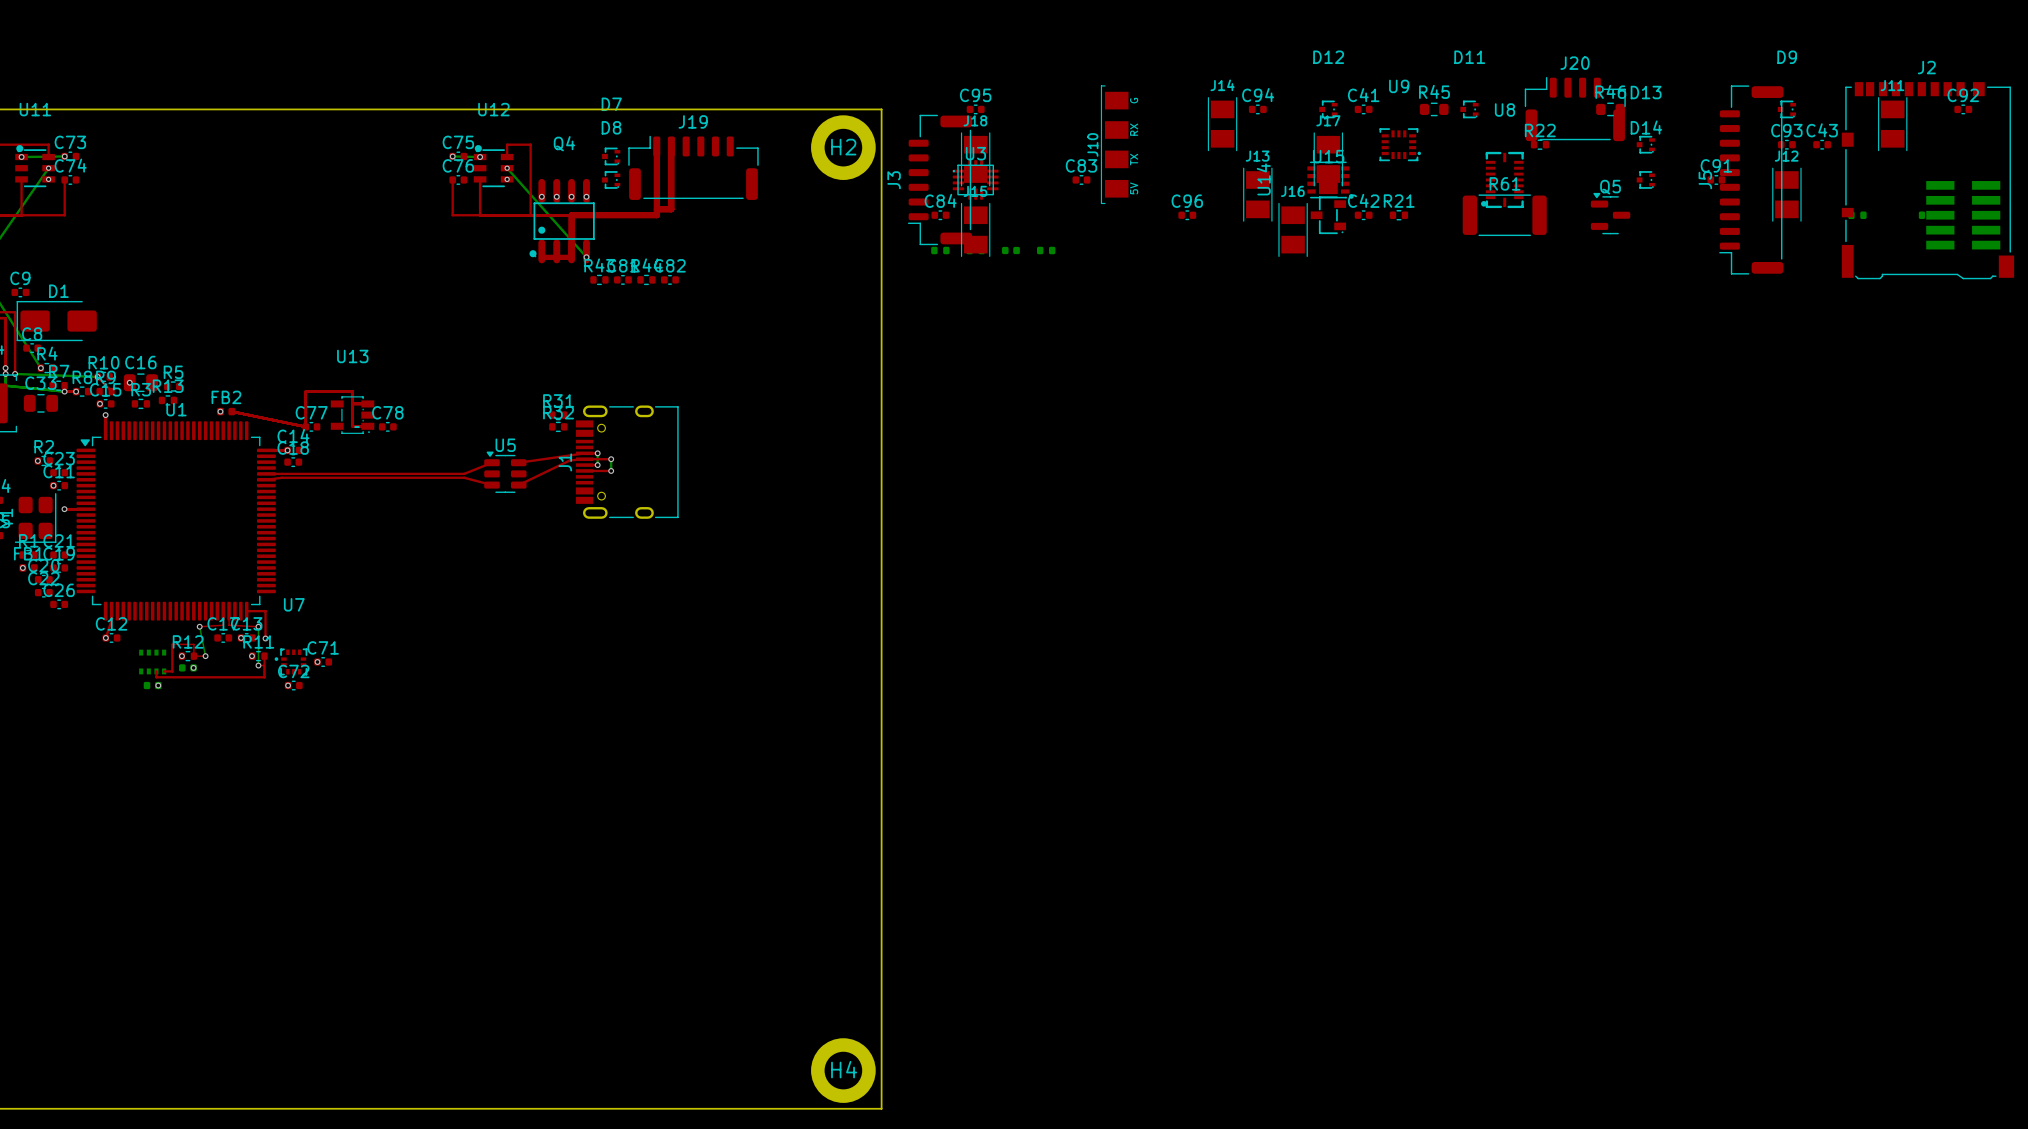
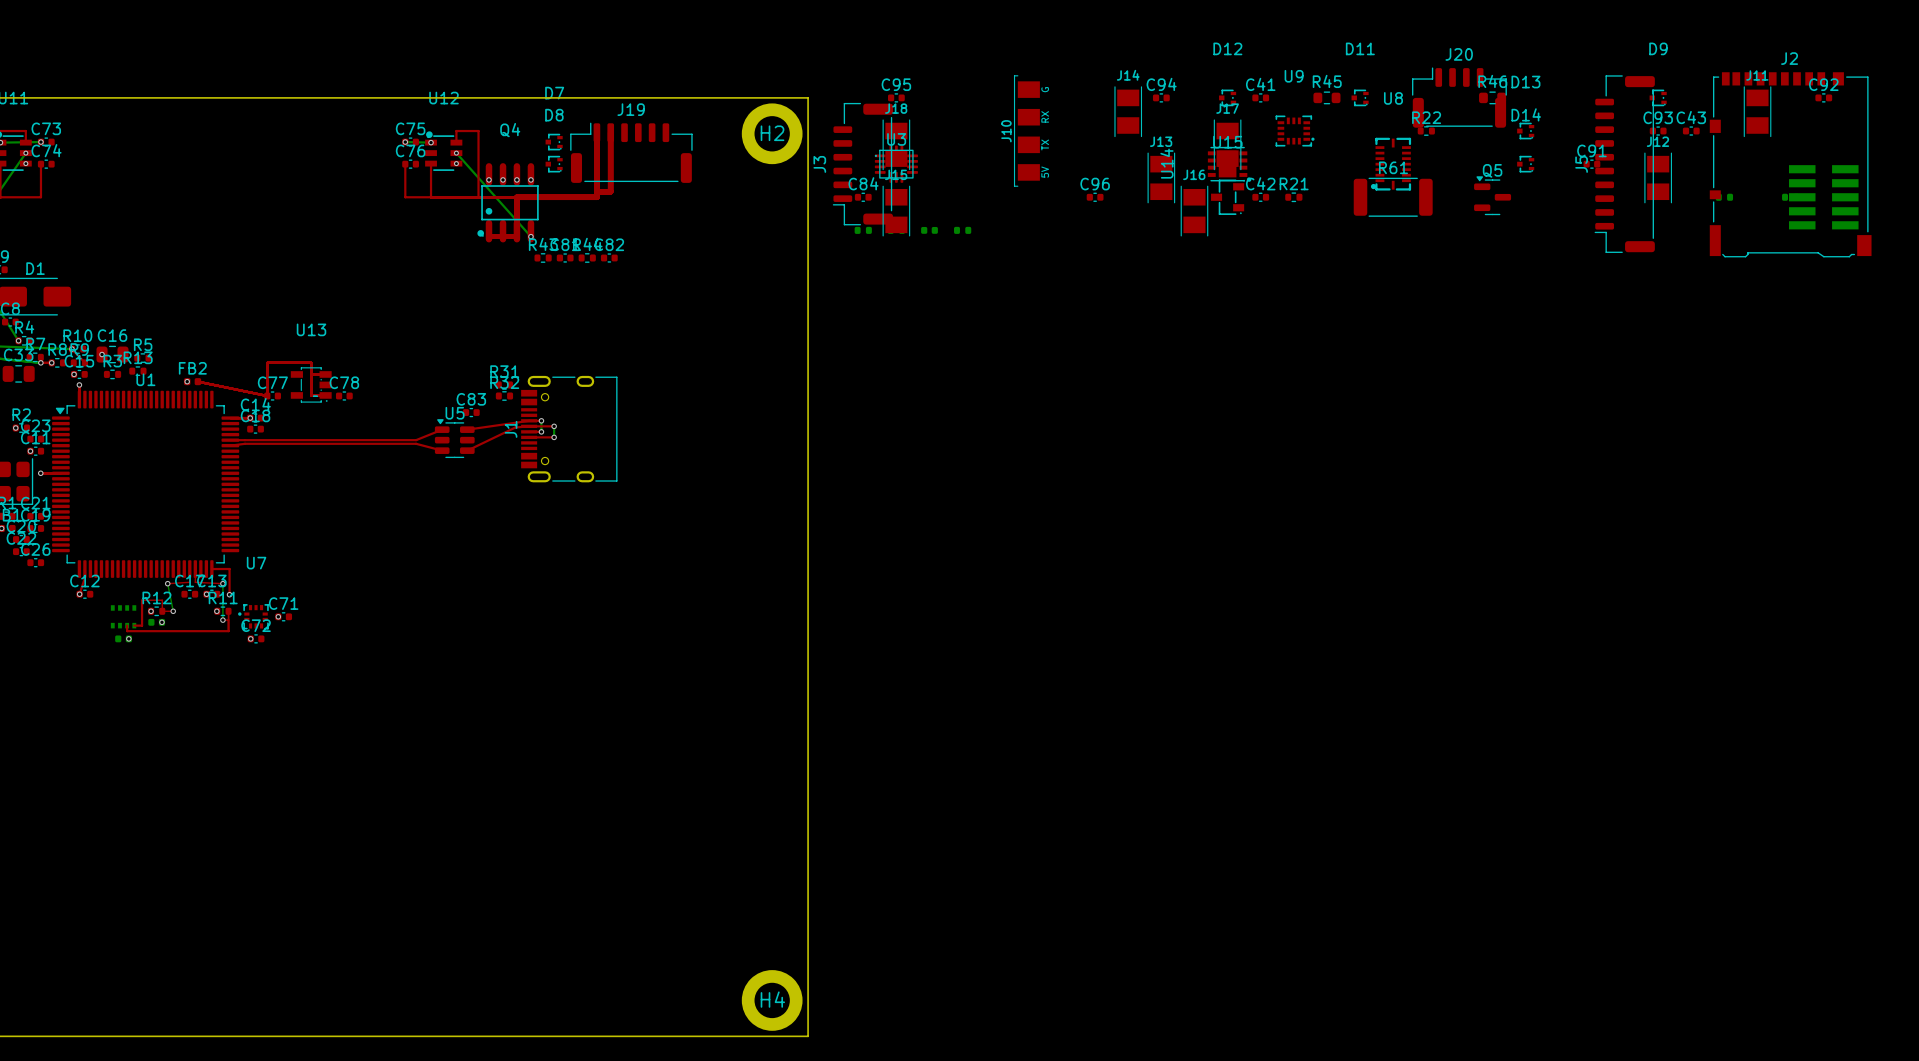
C83 position: (1081, 179) -> (471, 412)

